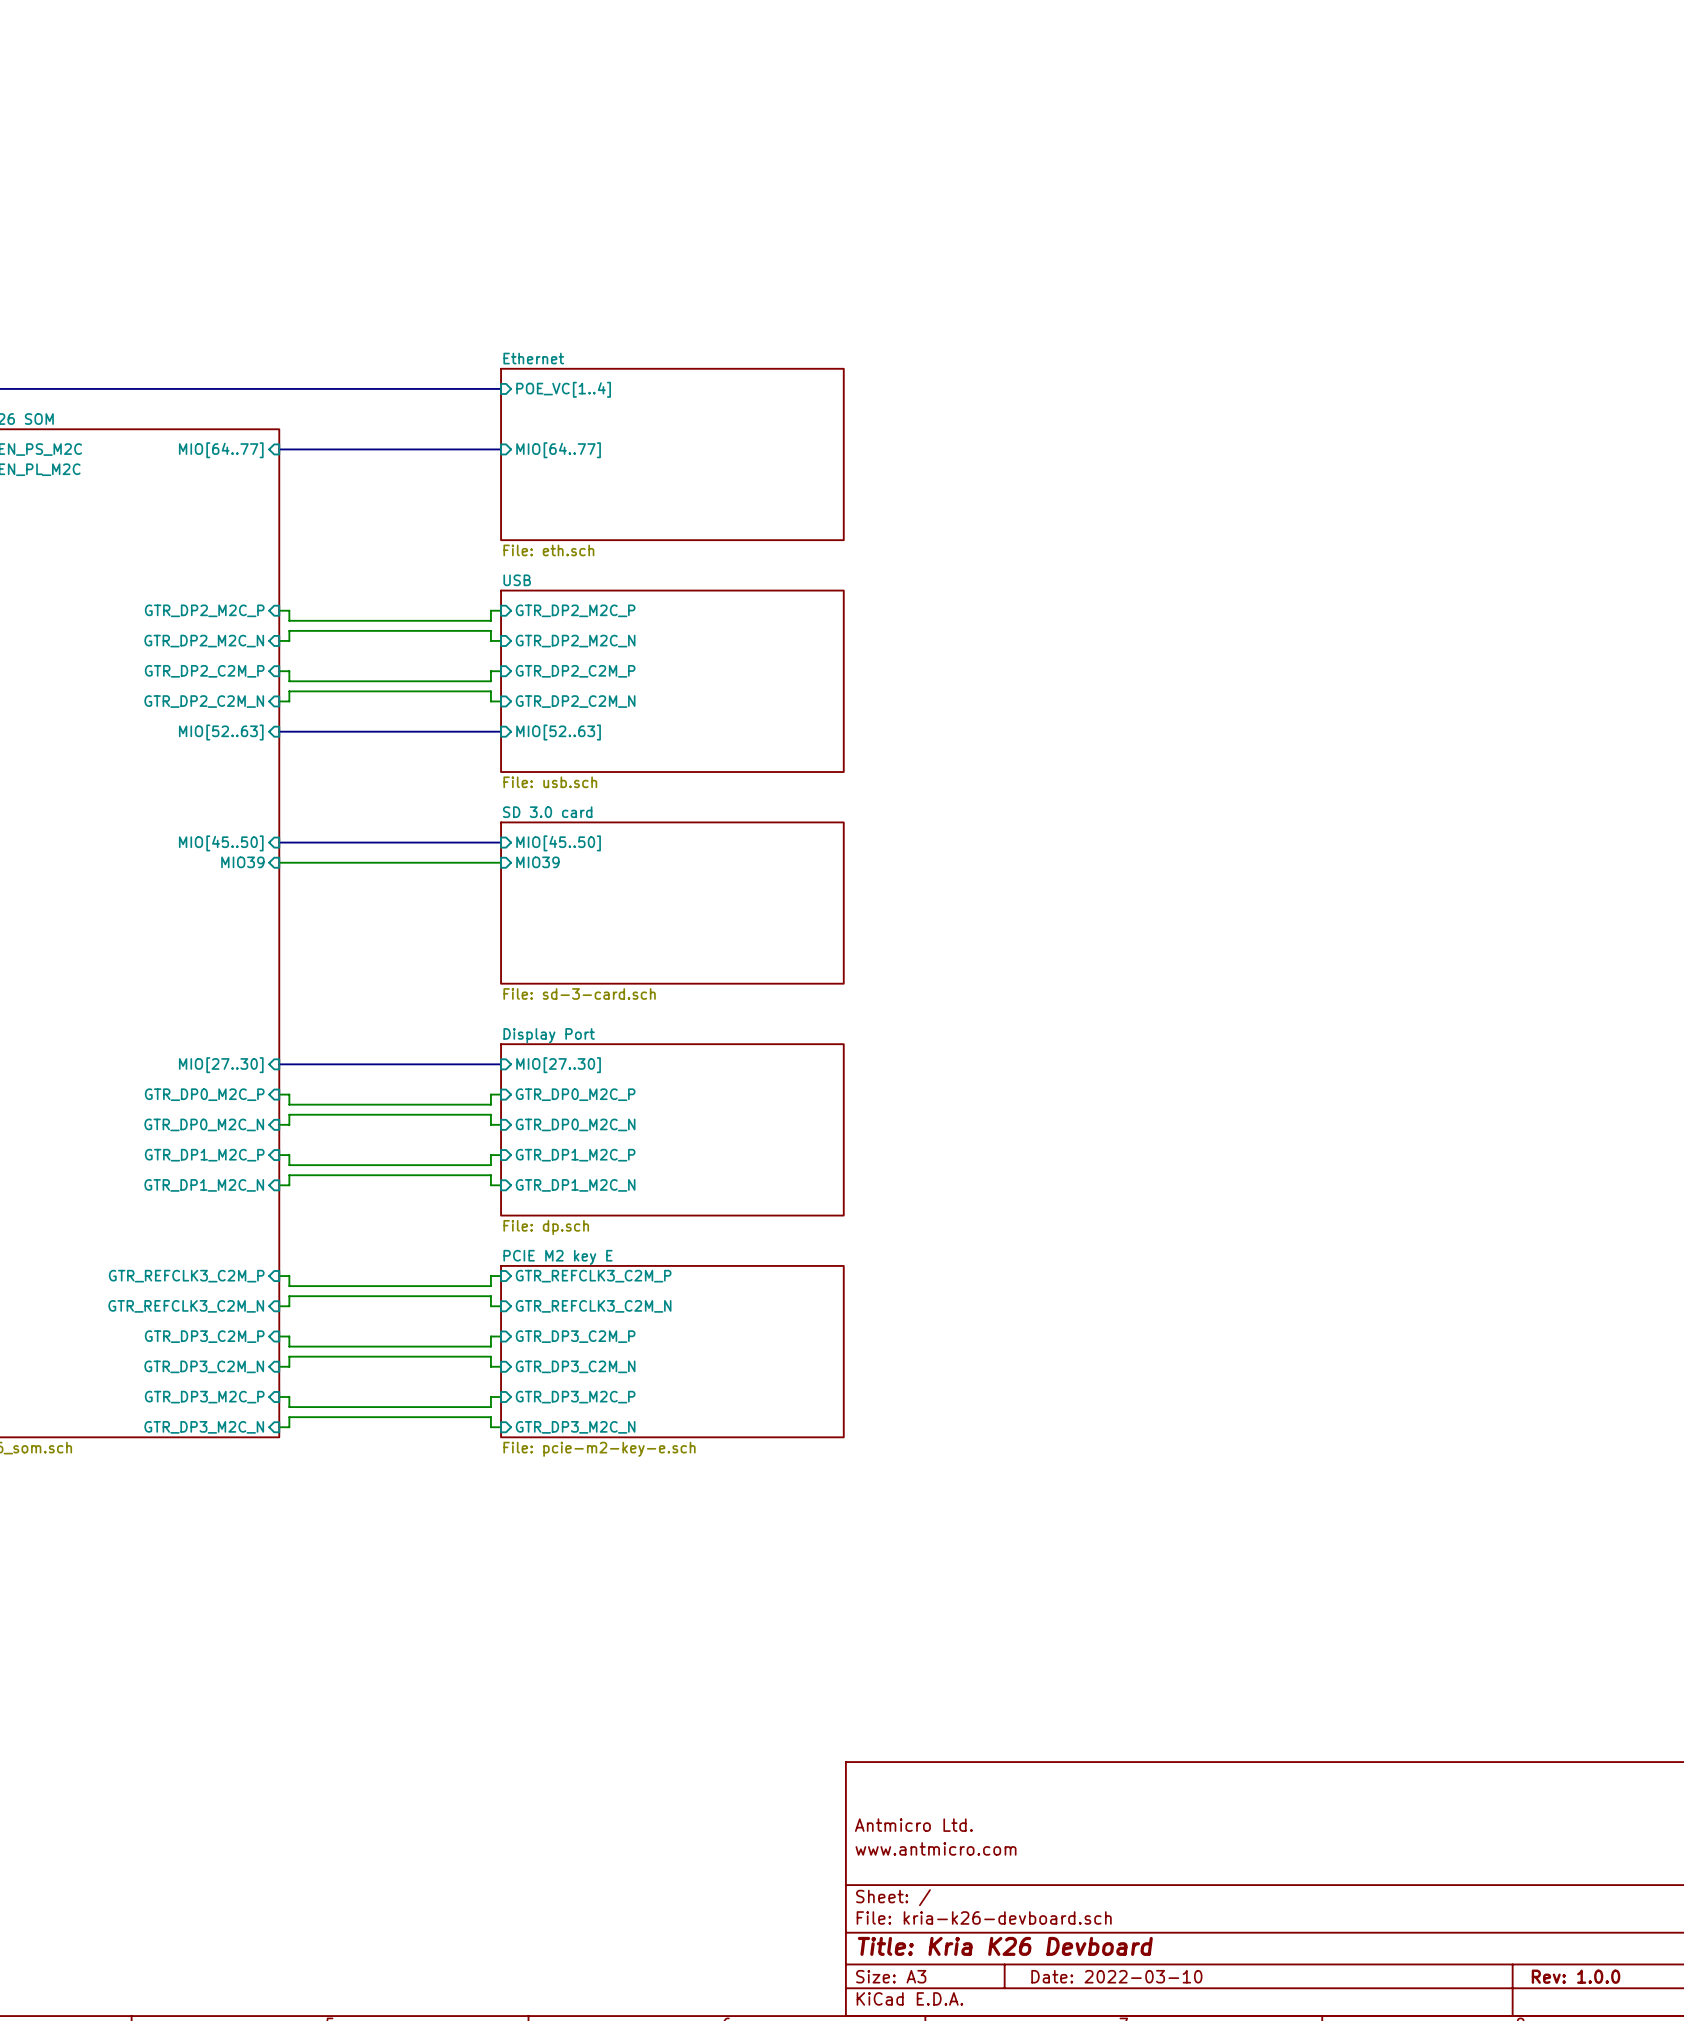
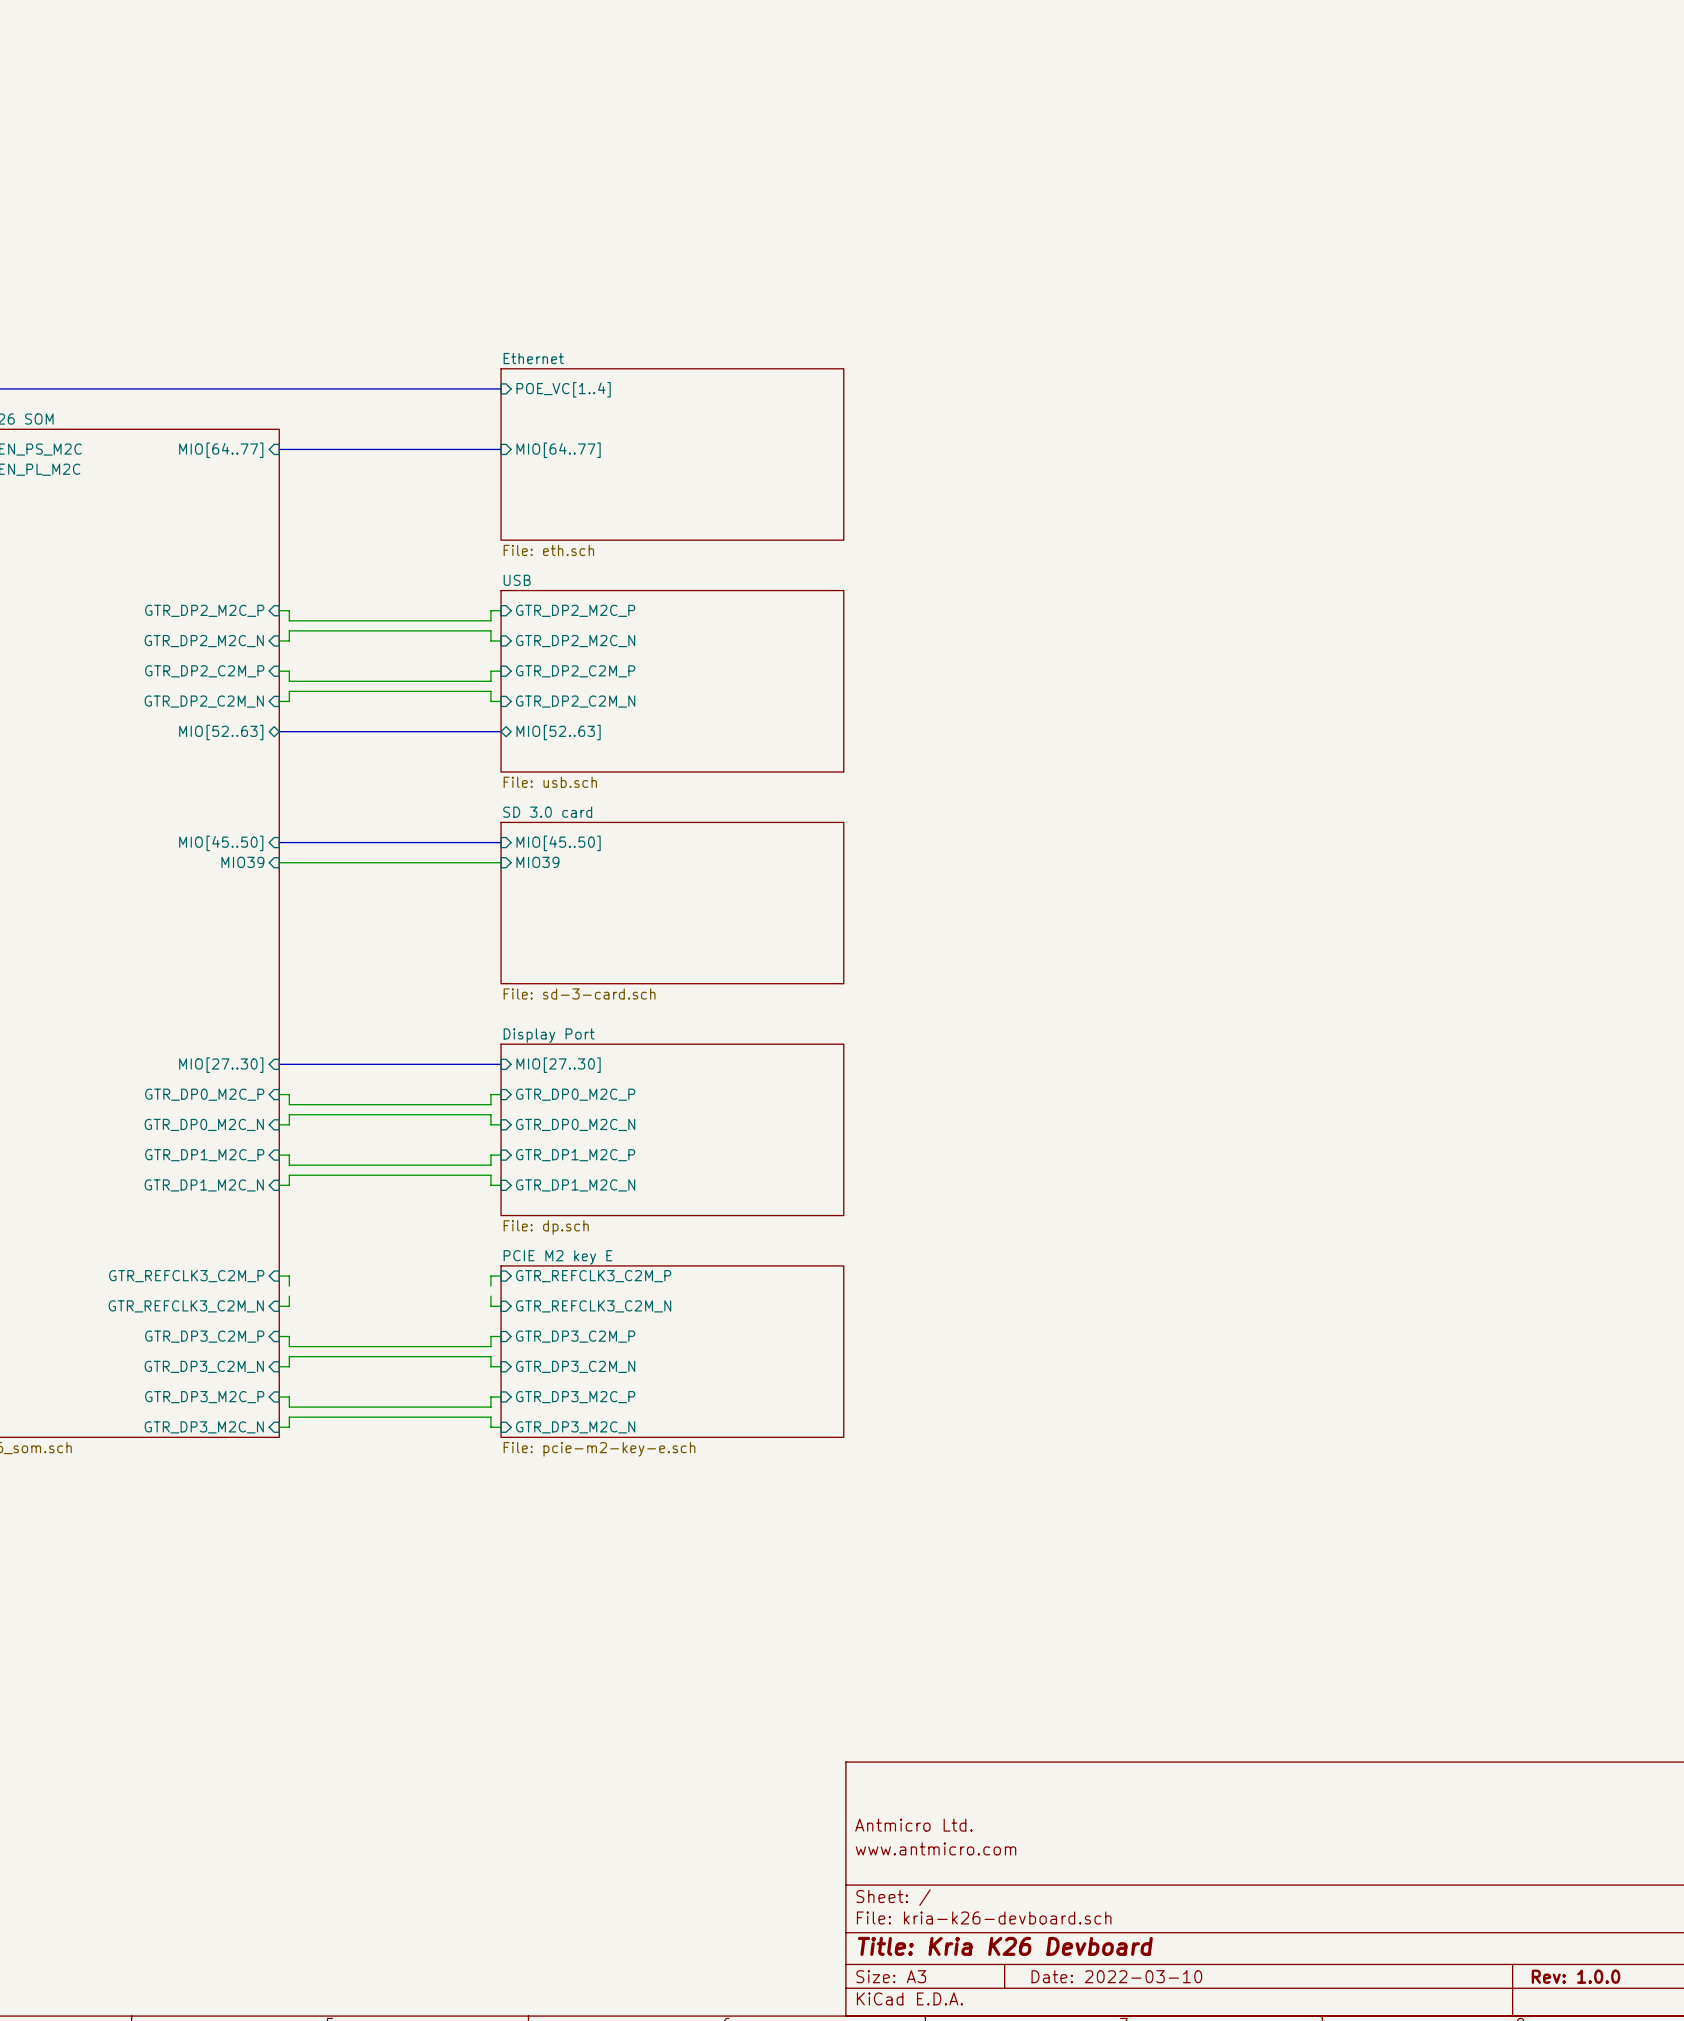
sheet pin shape: input (221, 732) -> bidirectional (221, 732)
sheet pin shape: input (558, 732) -> bidirectional (558, 732)
wire: (289, 1286) (490, 1286) -> none
wire: (289, 1296) (490, 1296) -> none

